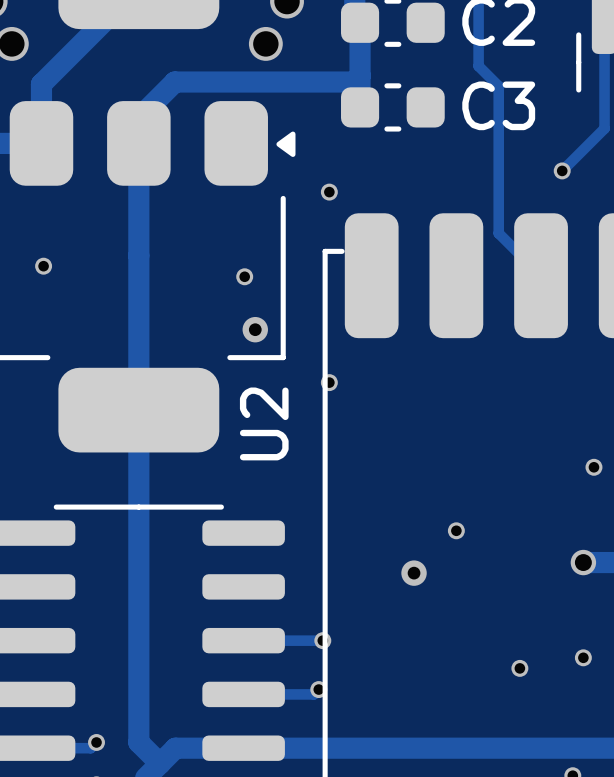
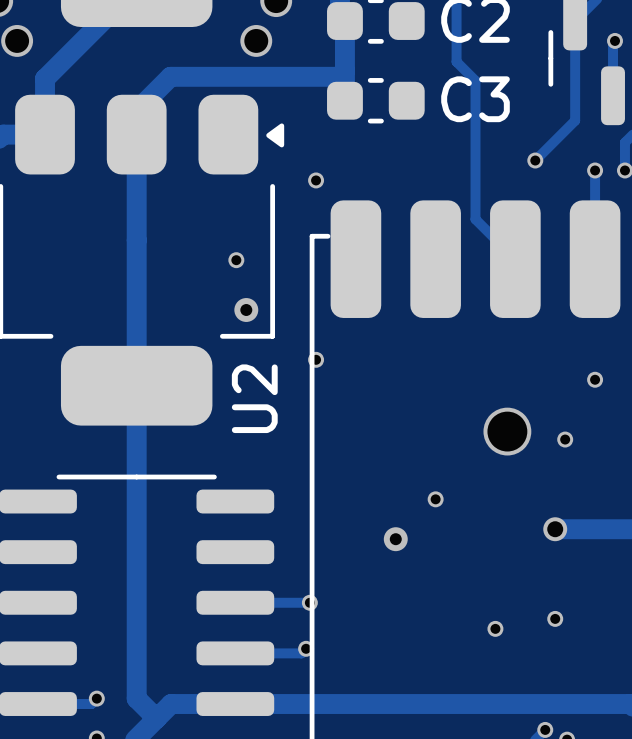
via: (43, 266) -> none
via: none -> (507, 431)

